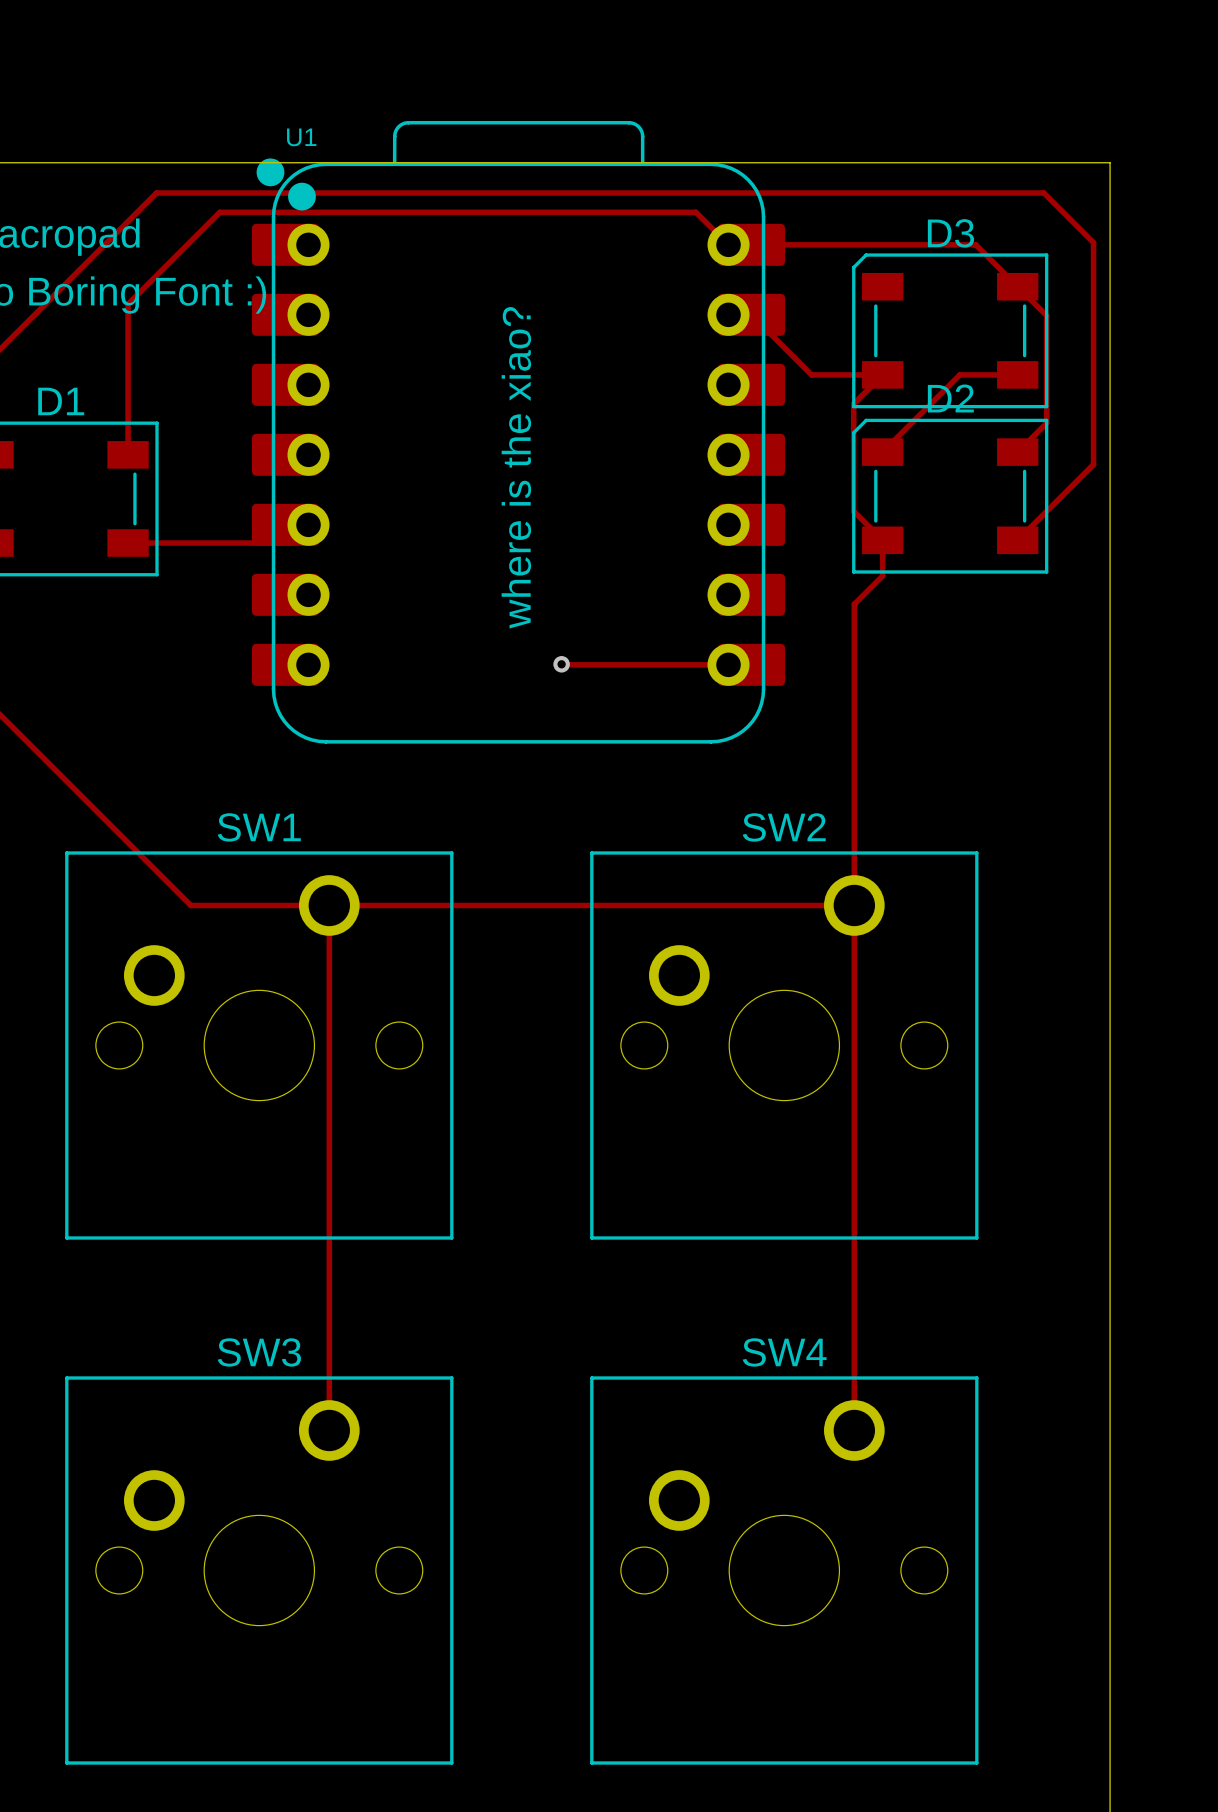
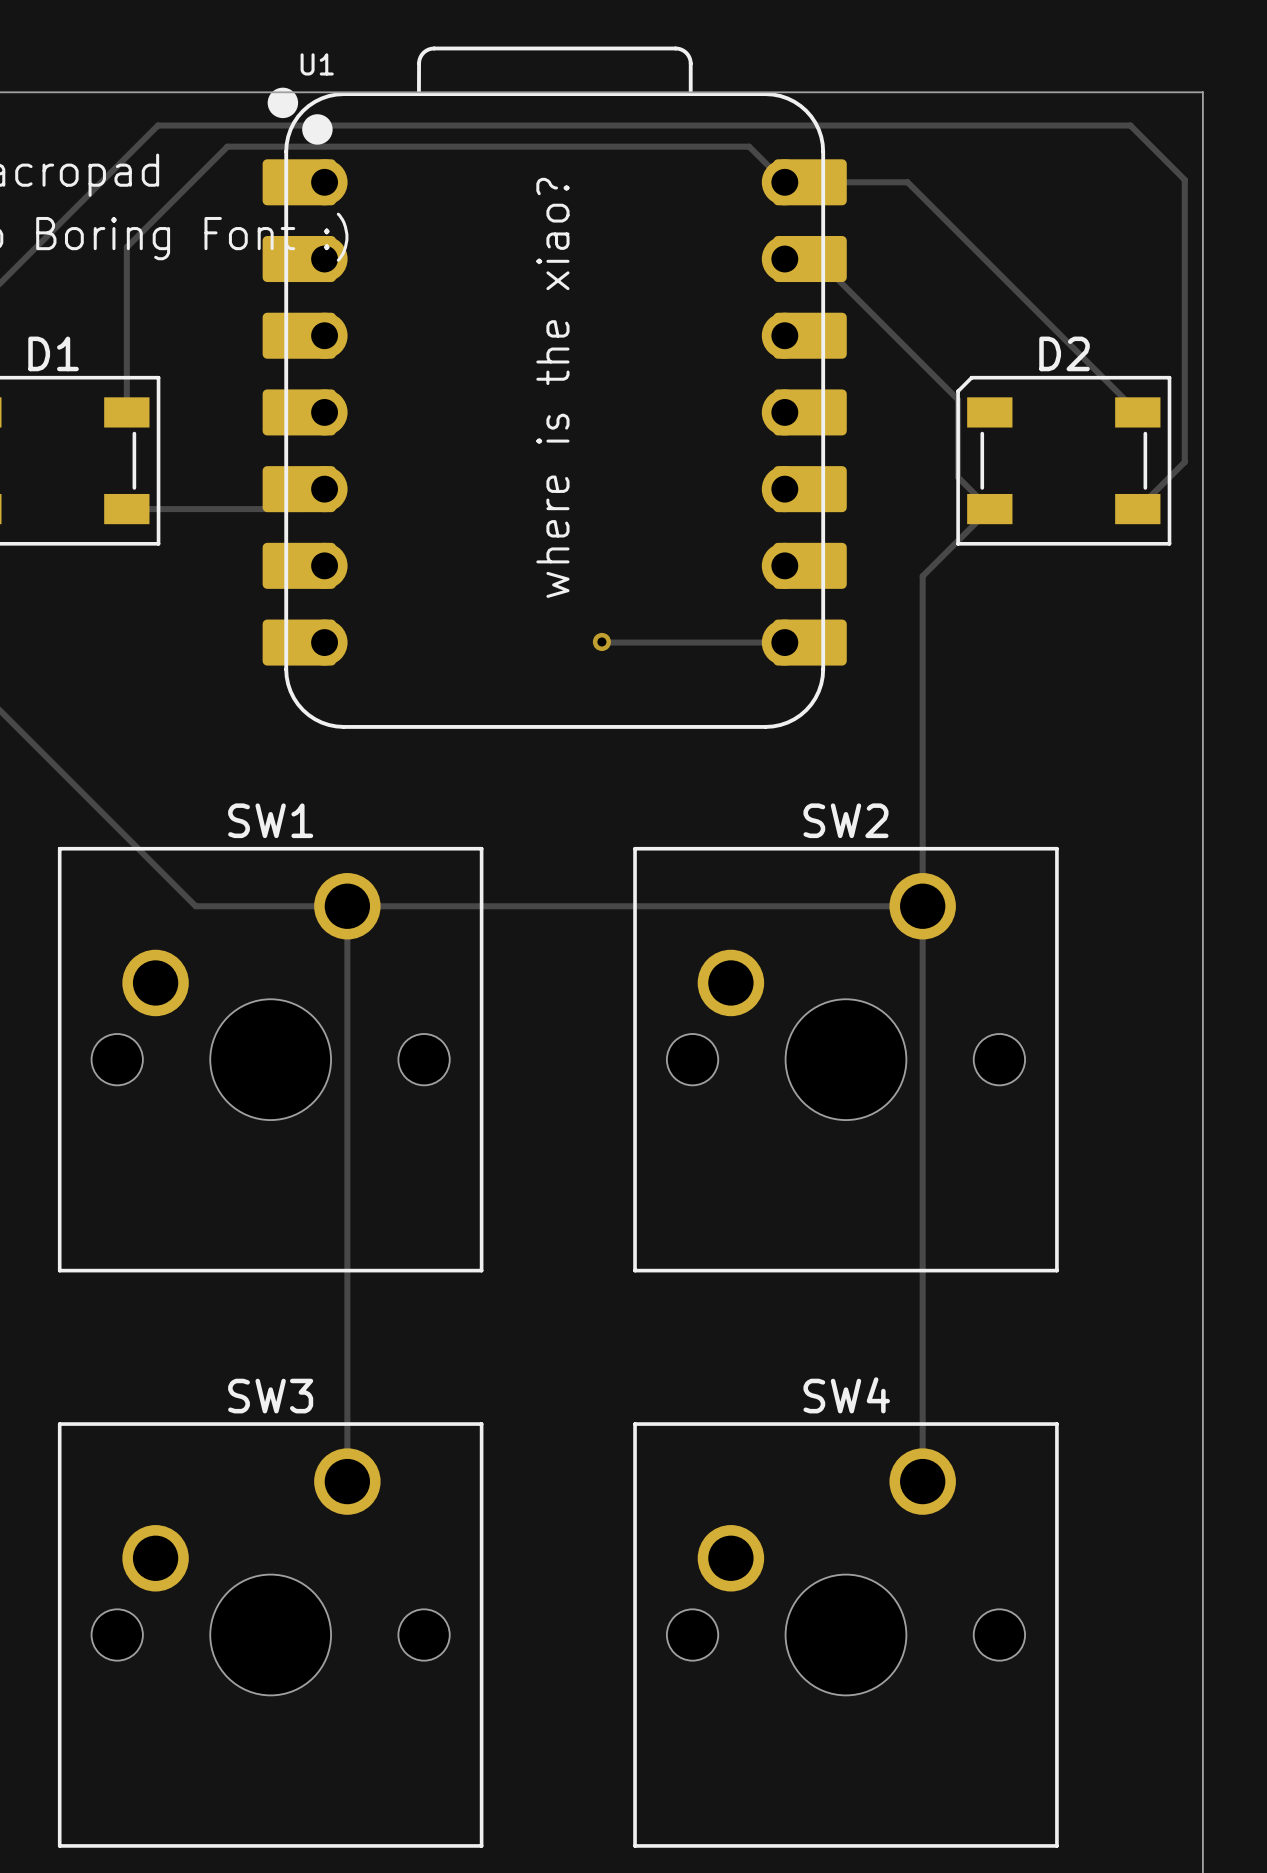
track: (840, 244) (975, 244) (1046, 315) (1046, 423) (1017, 452) -> (907, 182) (1137, 412)
track: (751, 314) (811, 374) (882, 374) (853, 403) (853, 511) (882, 540) (882, 575) -> (817, 259) (958, 399) (958, 477) (989, 509) (953, 545)
D3: (950, 330) -> none
track: (1017, 374) (959, 374) (882, 452) -> none
track: (1093, 464) (1017, 540) -> (1184, 423) (1184, 462) (1137, 509)
D2 position: (950, 496) -> (1063, 460)

